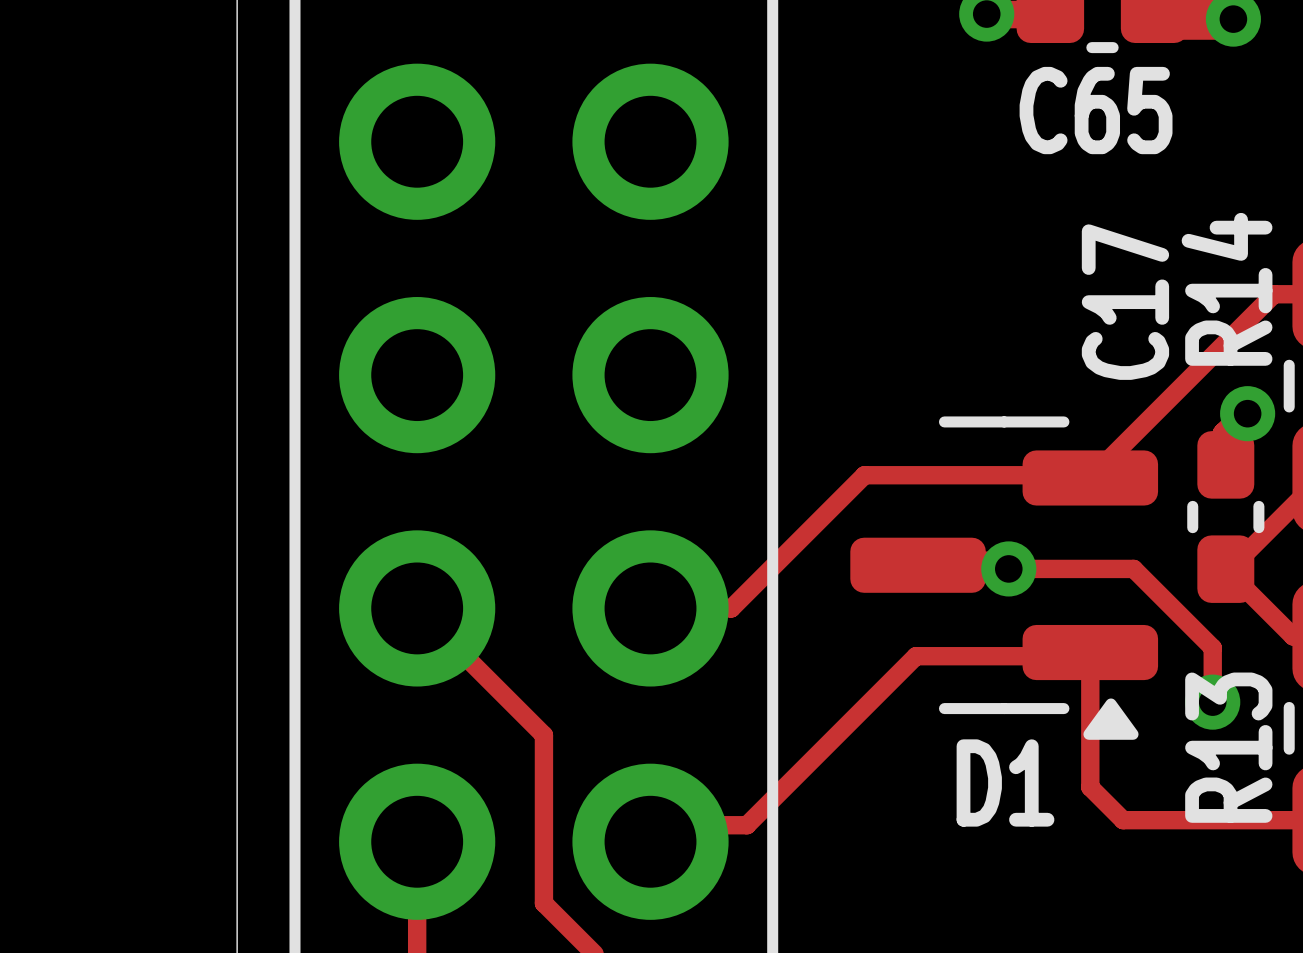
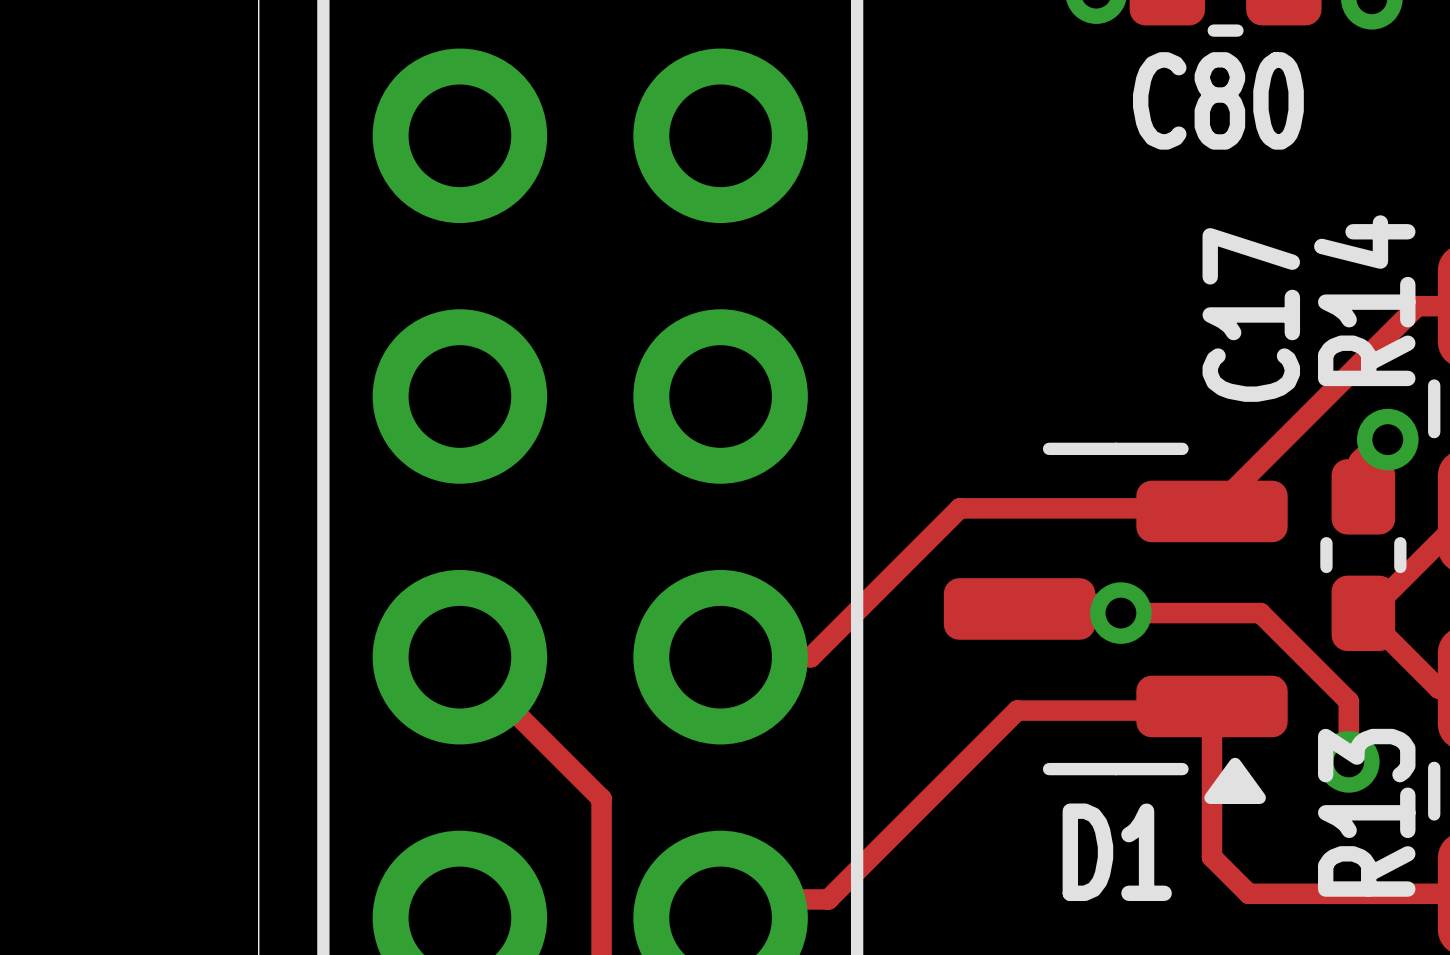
C65 name: C65 (1096, 110) -> C80 (1218, 100)

